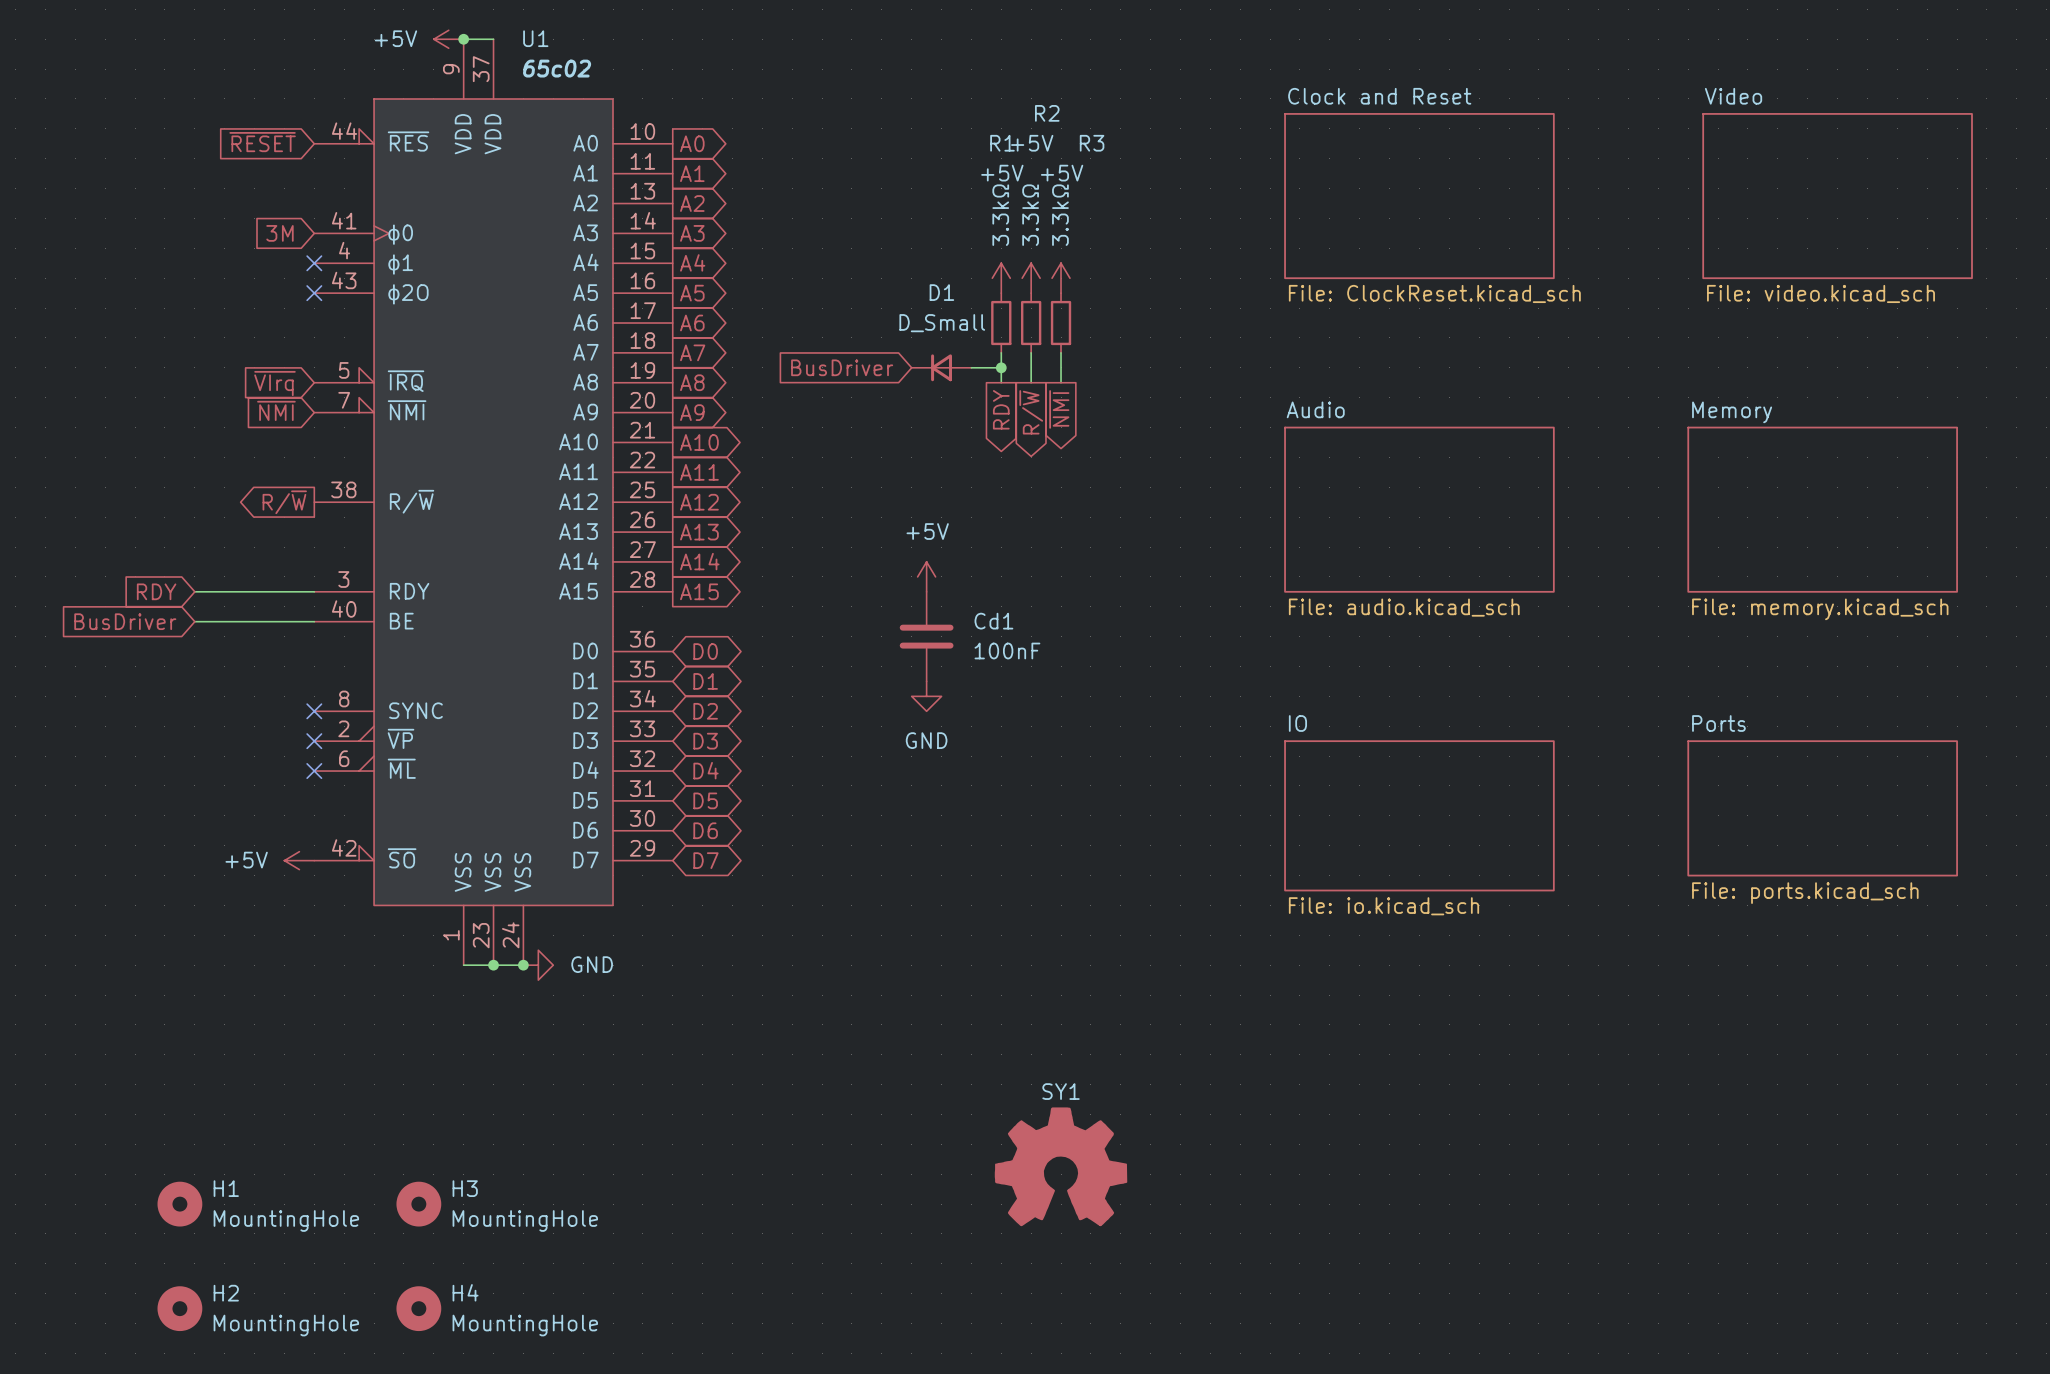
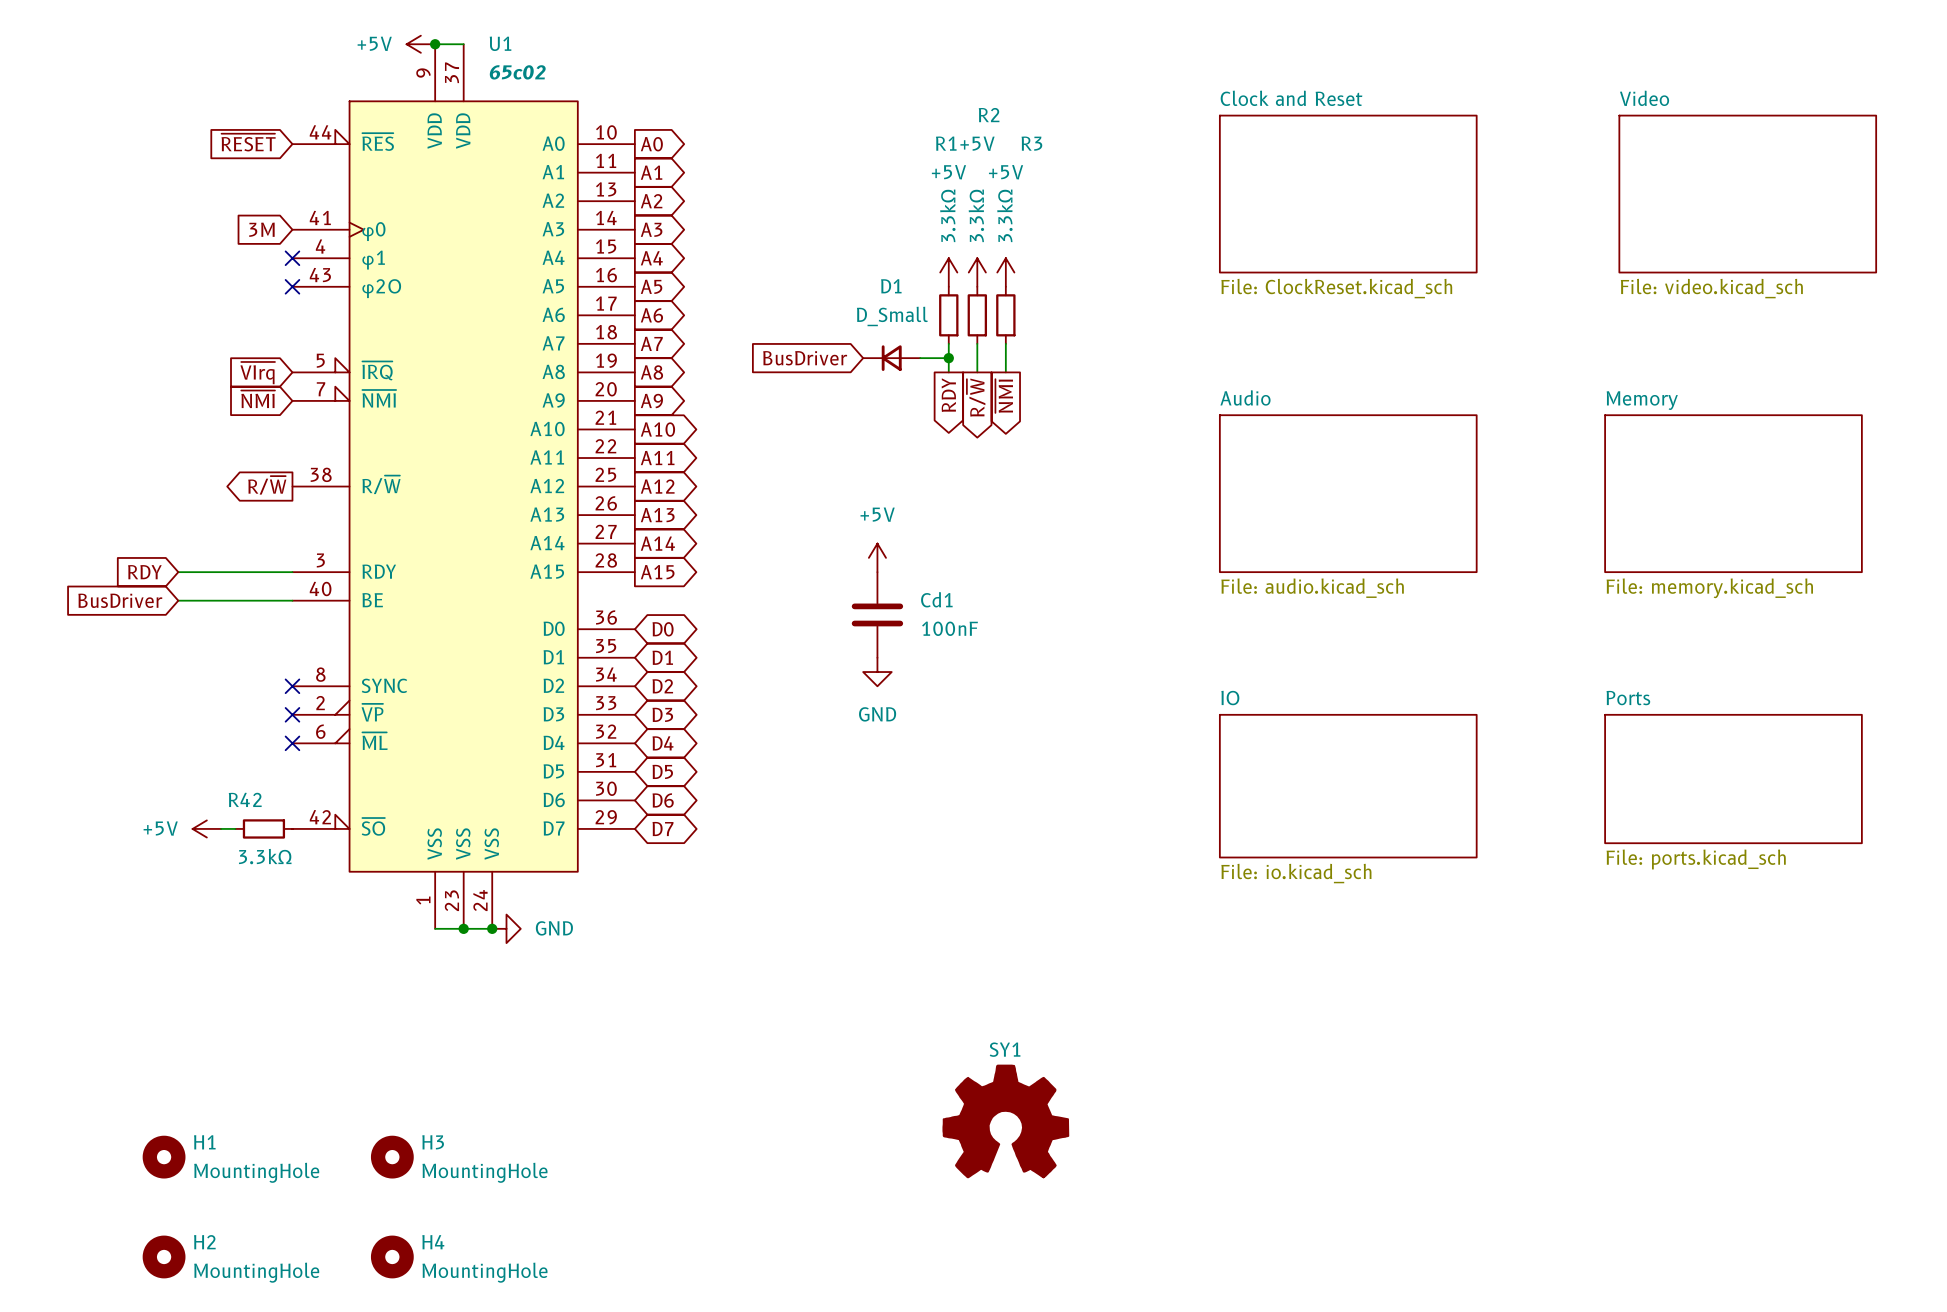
wire: none -> (221, 828) (235, 828)
R42: none -> 3.3kΩ (263, 828)
power symbol position: +5V (299, 860) -> +5V (206, 828)

